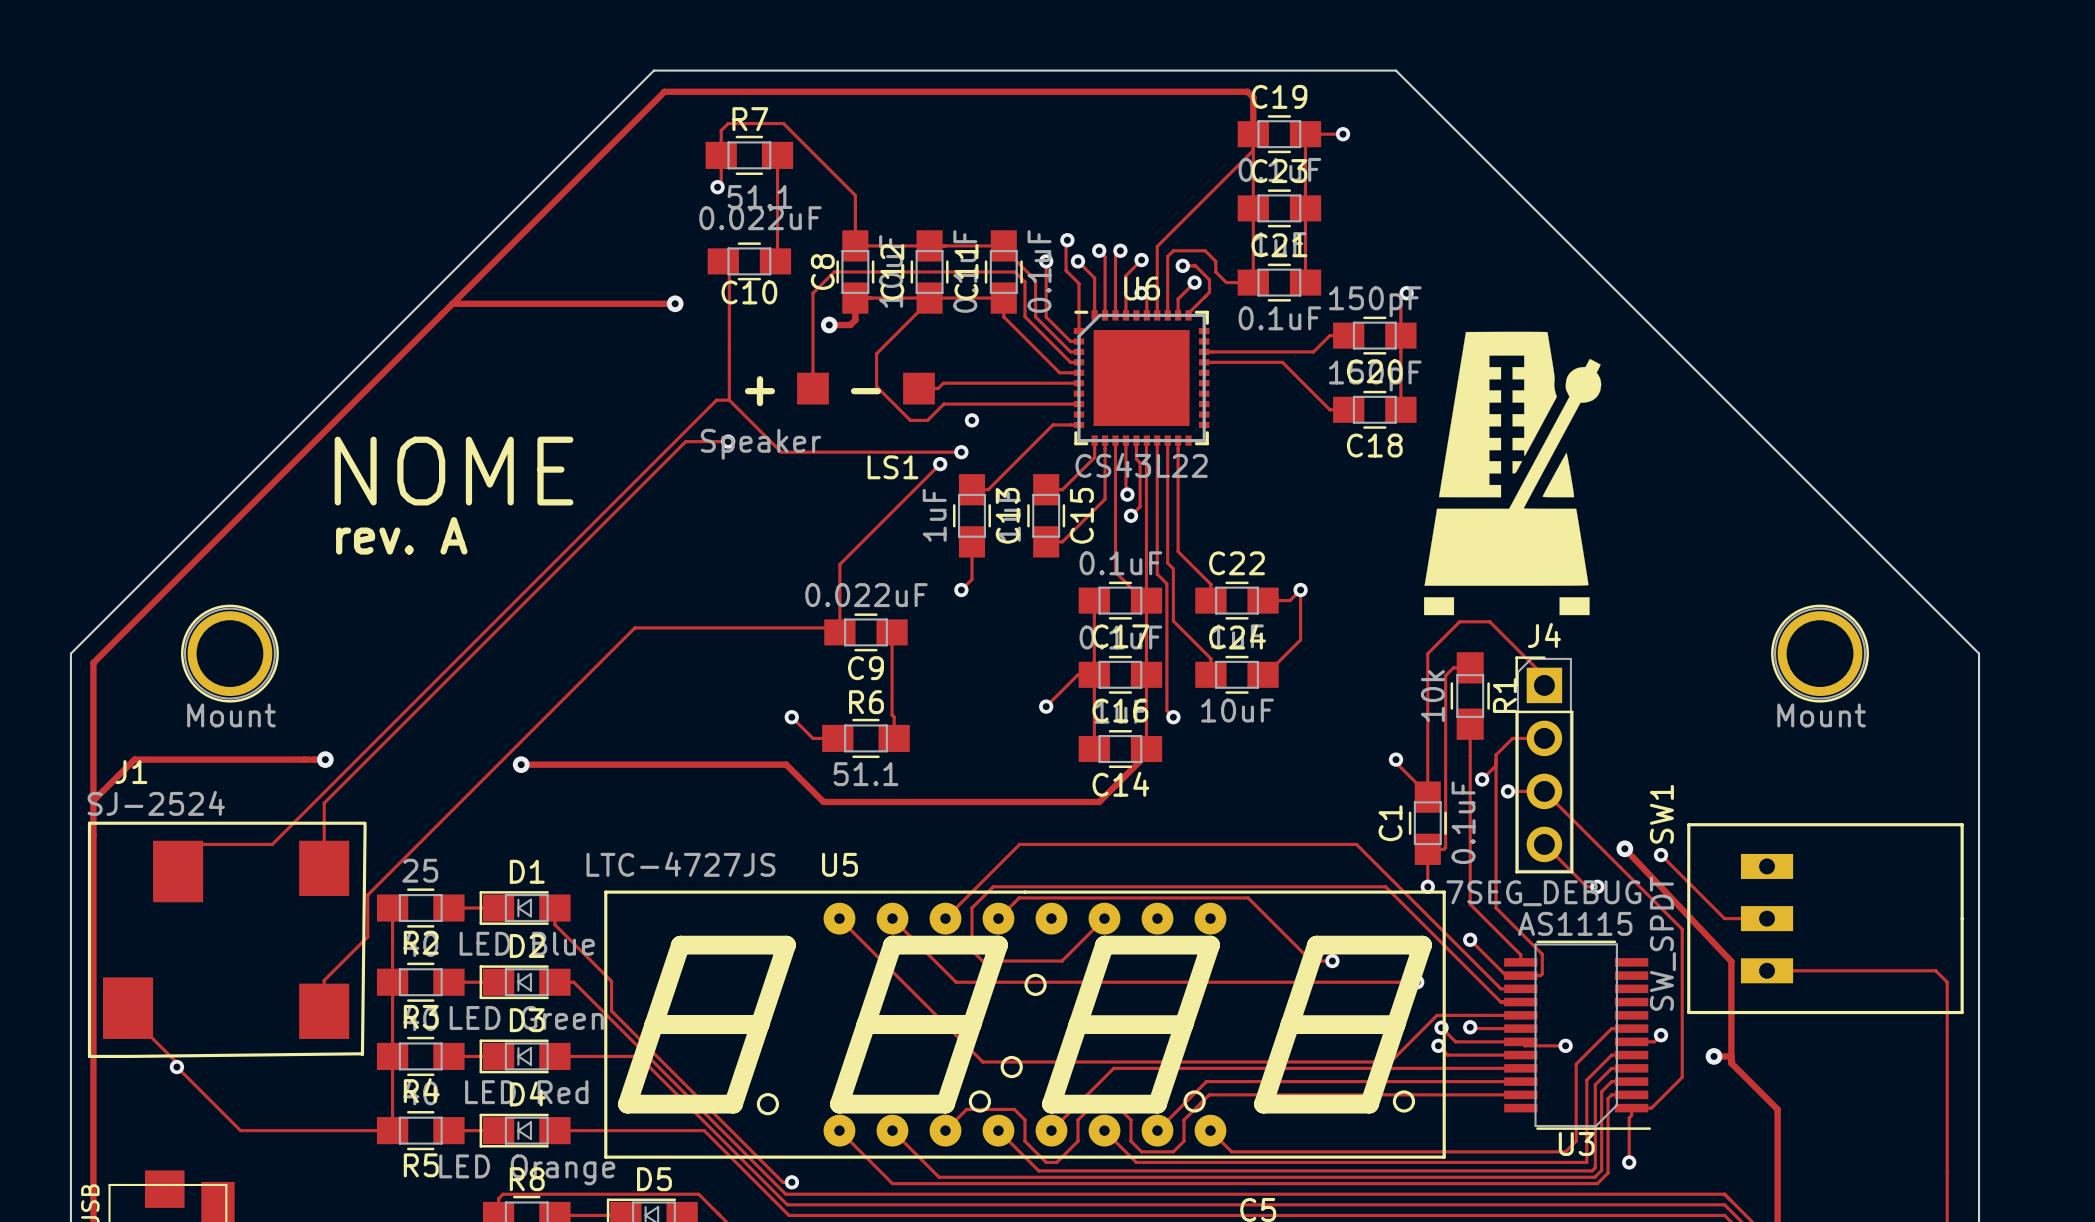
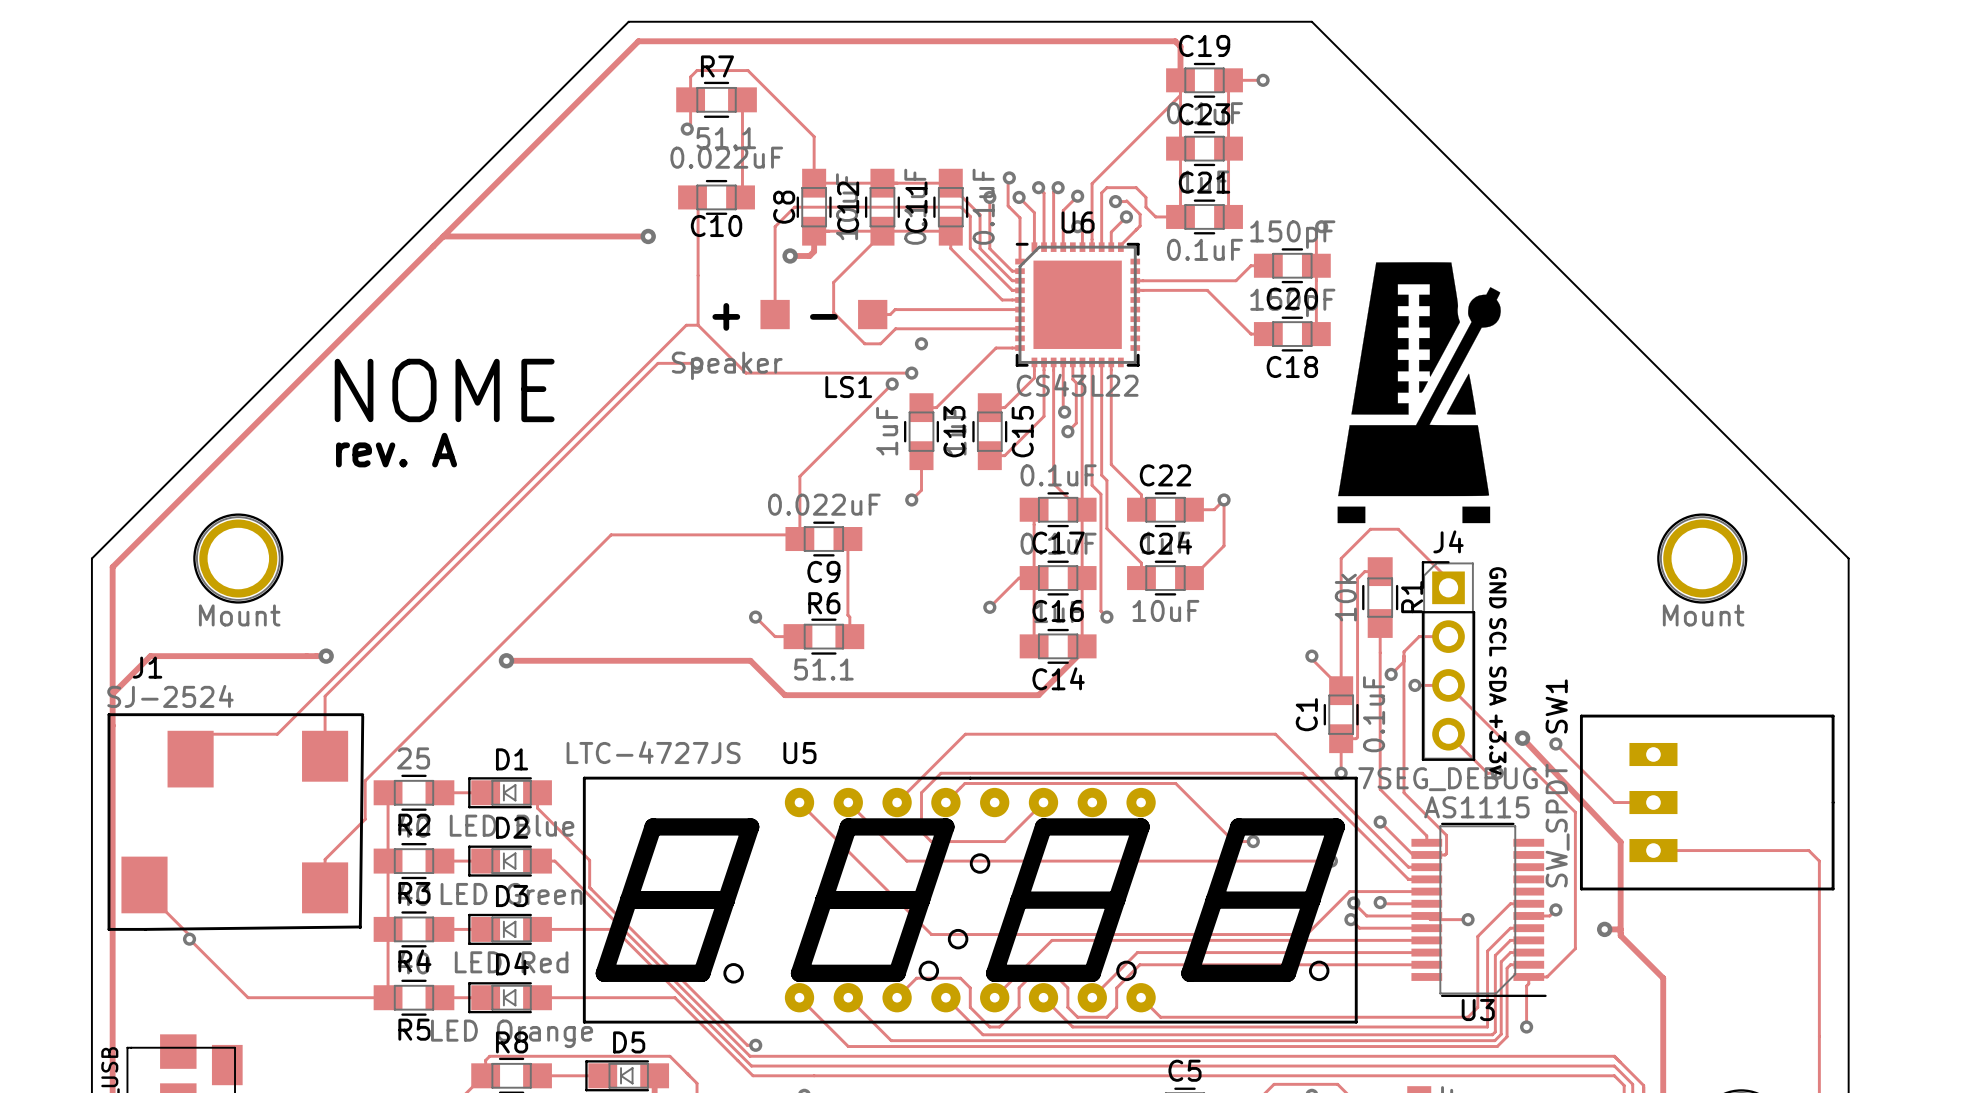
text: none -> GND (1497, 587)
text: none -> SCL (1497, 637)
text: none -> SDA (1497, 686)
text: none -> +3.3v (1497, 744)

